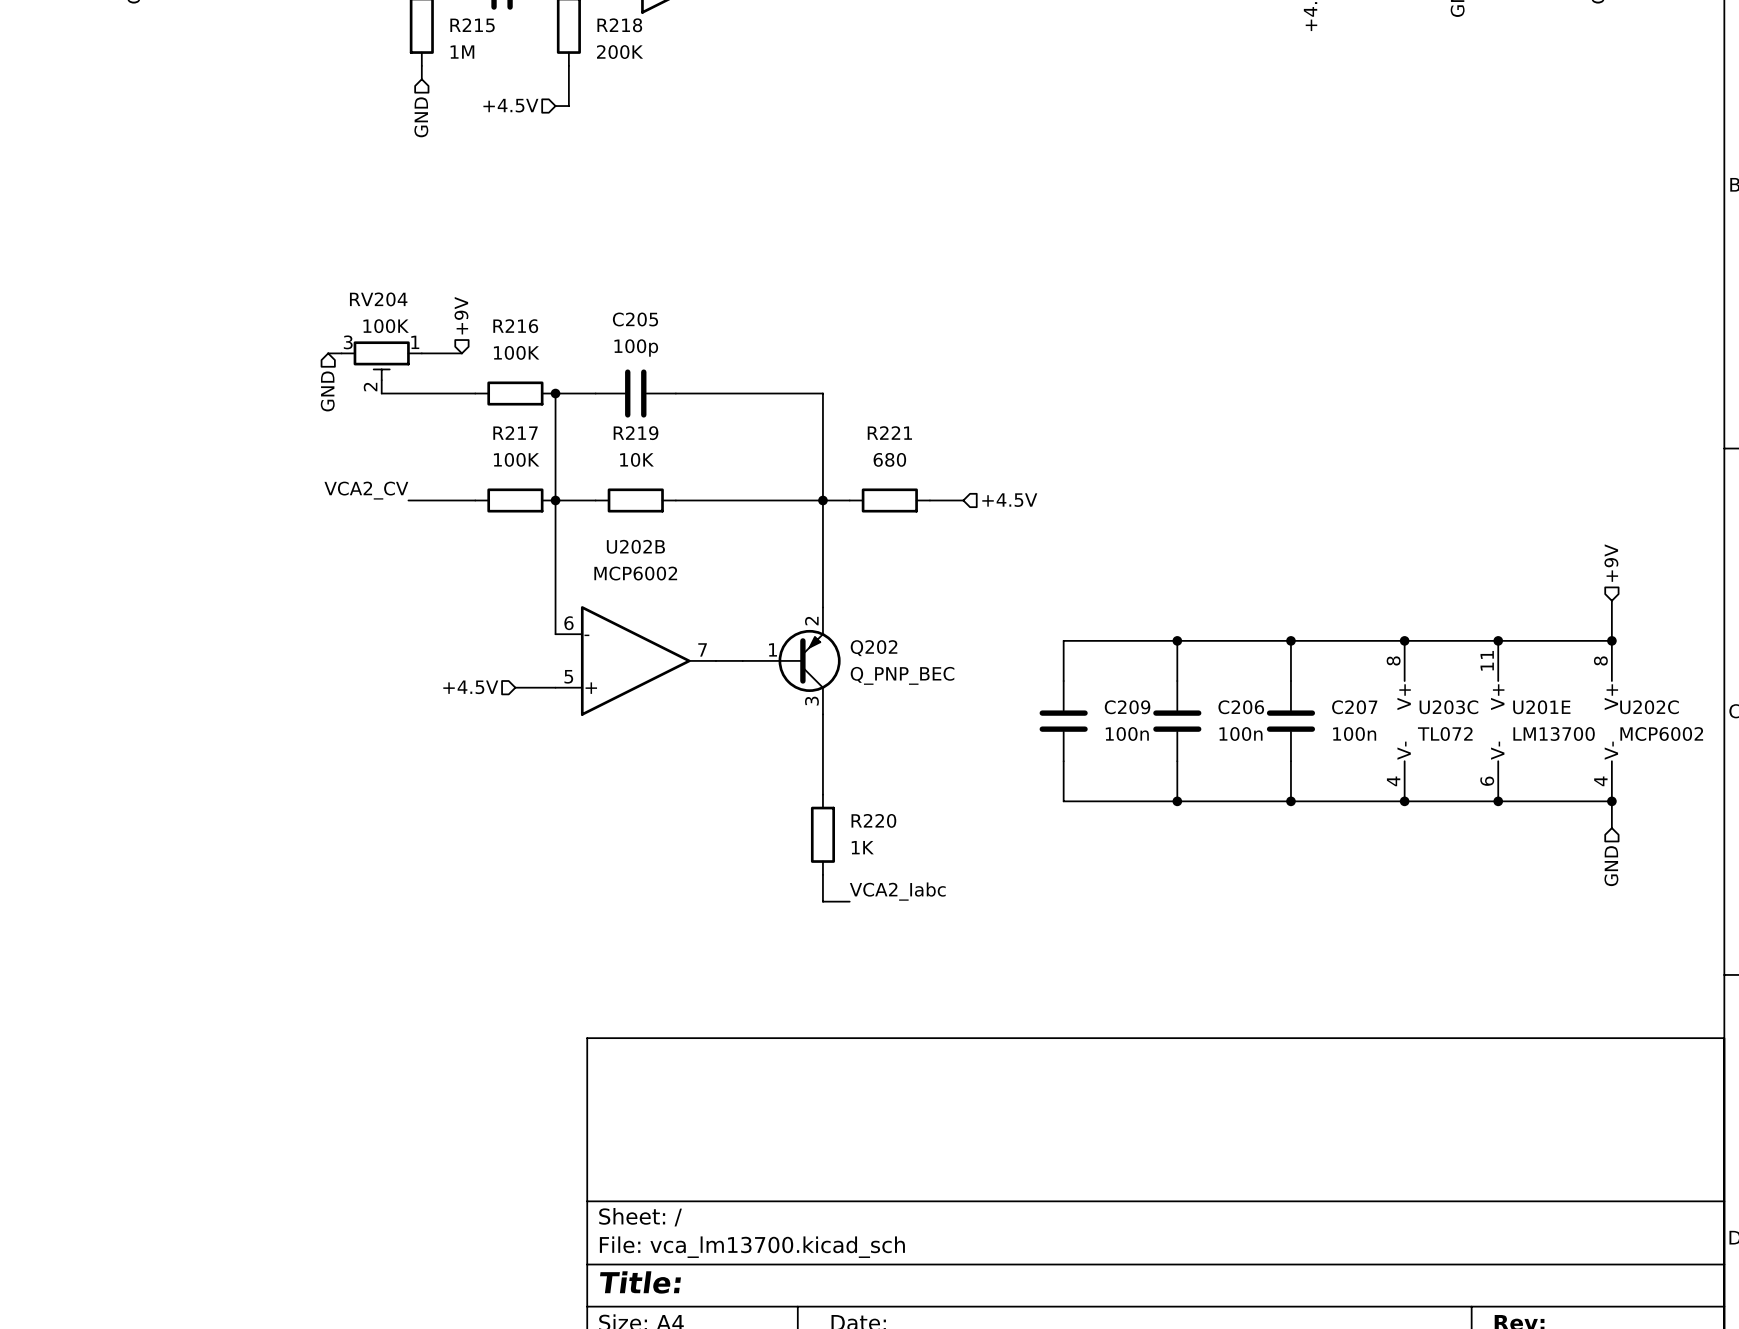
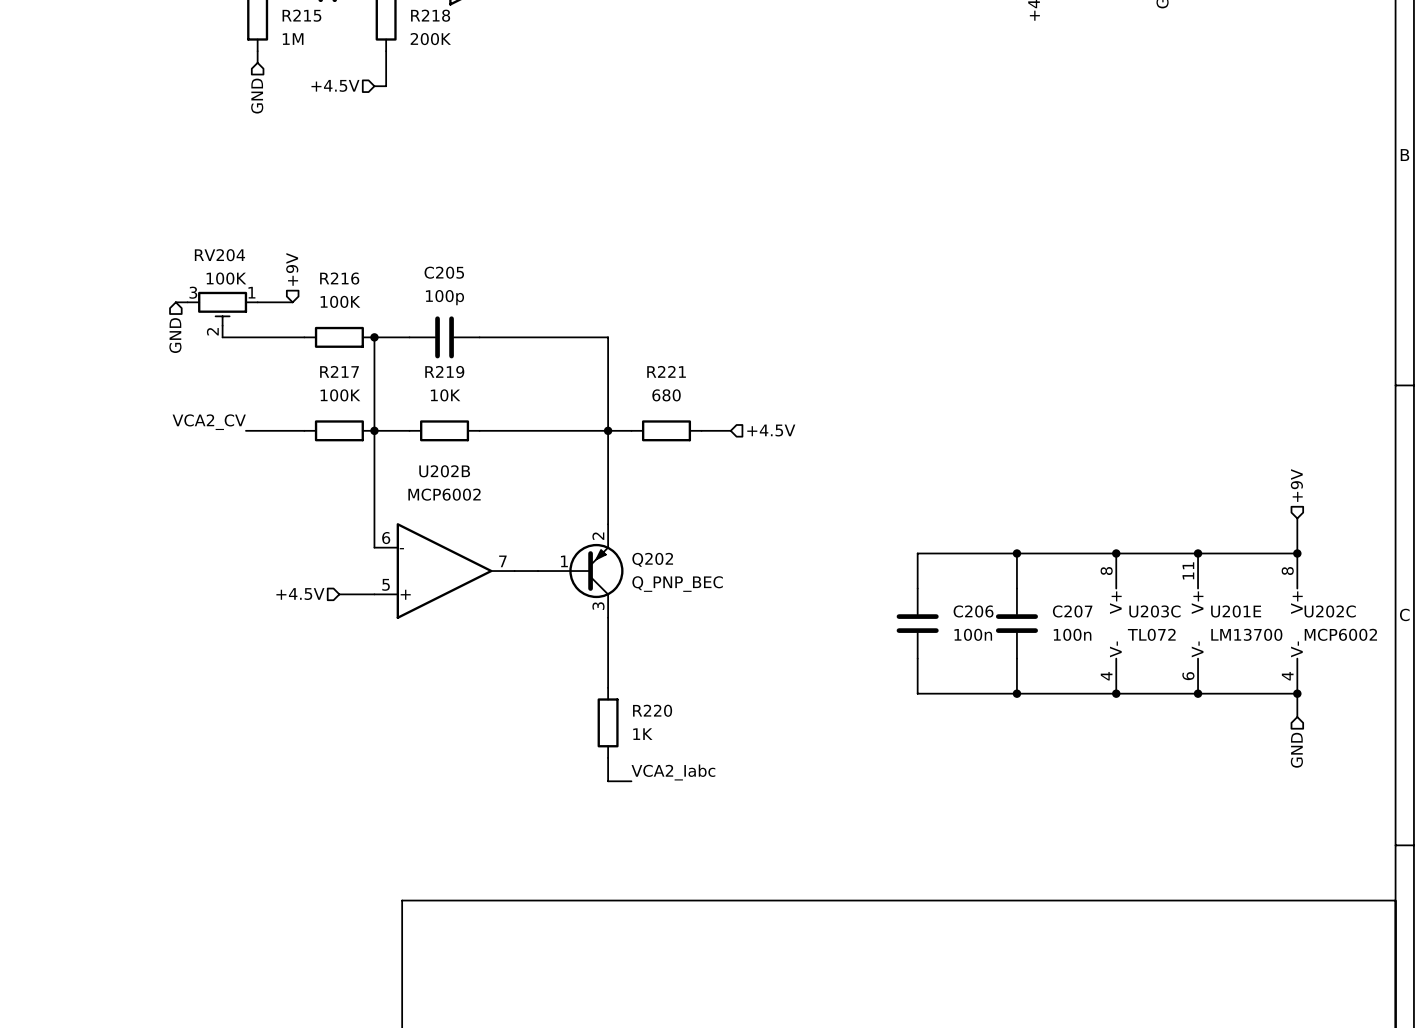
wire: (1177, 640) (1063, 640) (1063, 681) -> none
junction: (1177, 640) -> none
C209: 100n (1063, 721) -> none
wire: (1063, 761) (1063, 801) (1177, 801) -> none
junction: (1177, 801) -> none

